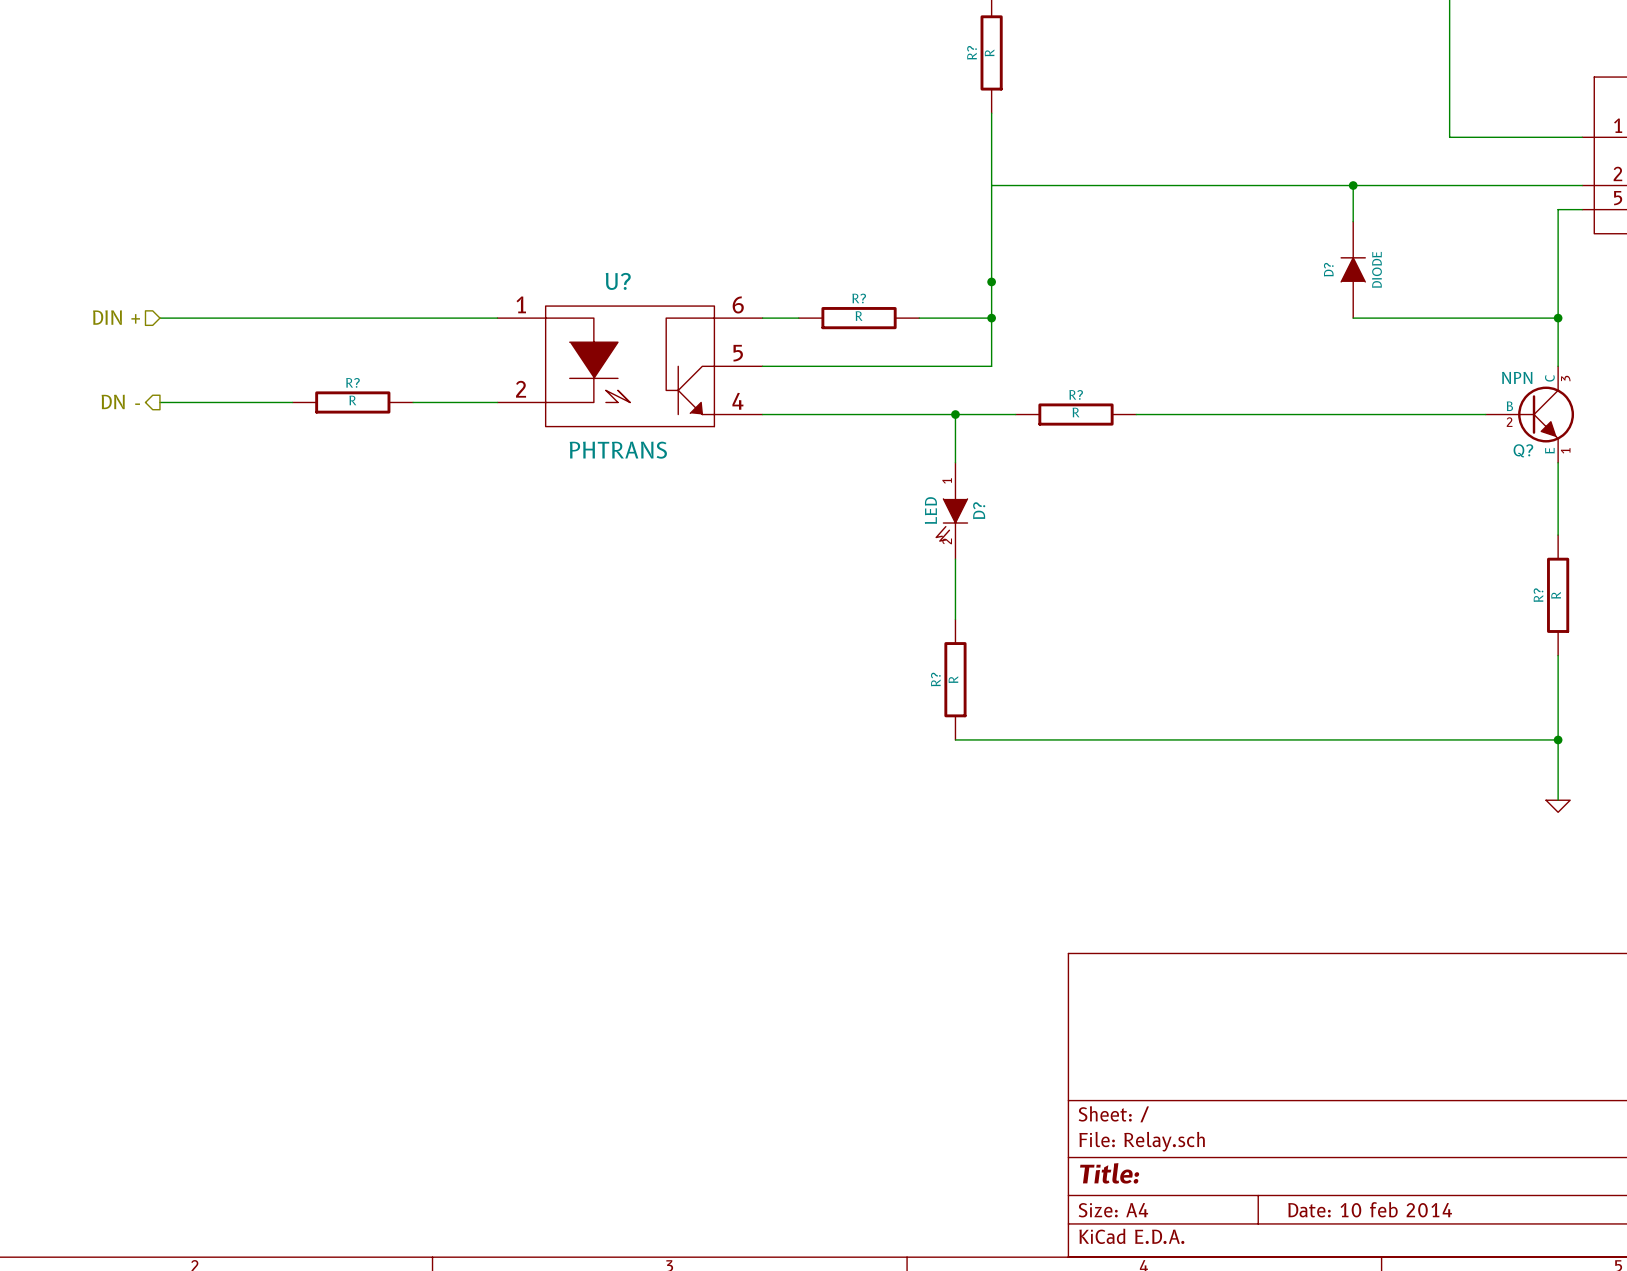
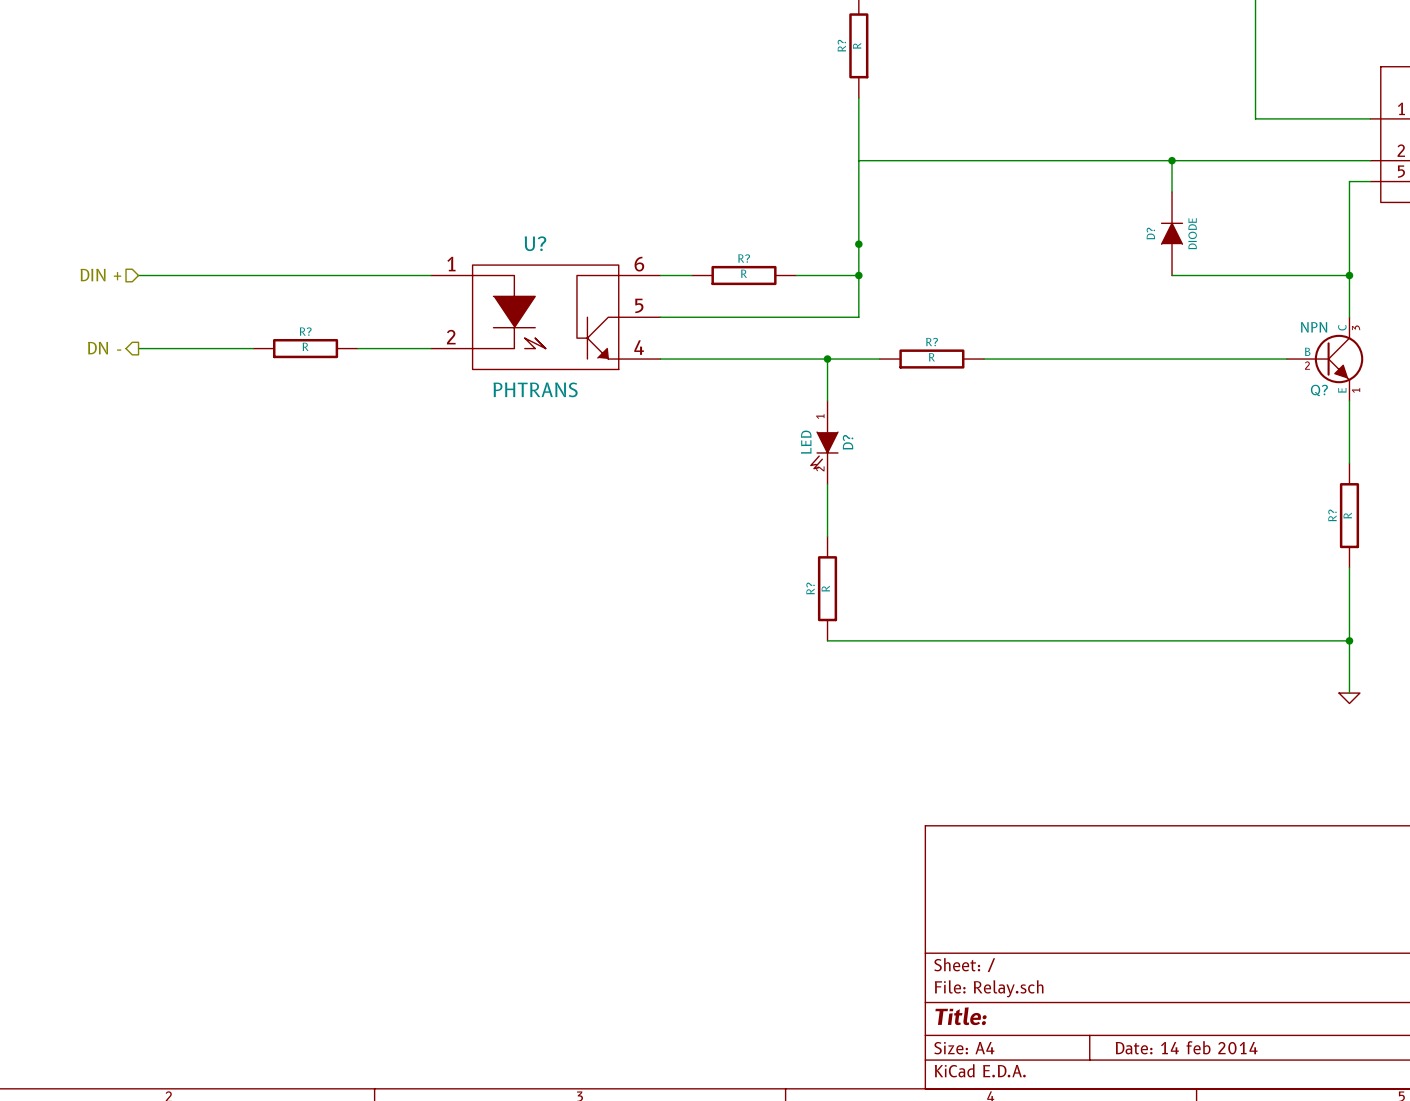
title block: Date: 10 feb 2014 (1370, 1209) -> Date: 14 feb 2014 (1186, 1047)

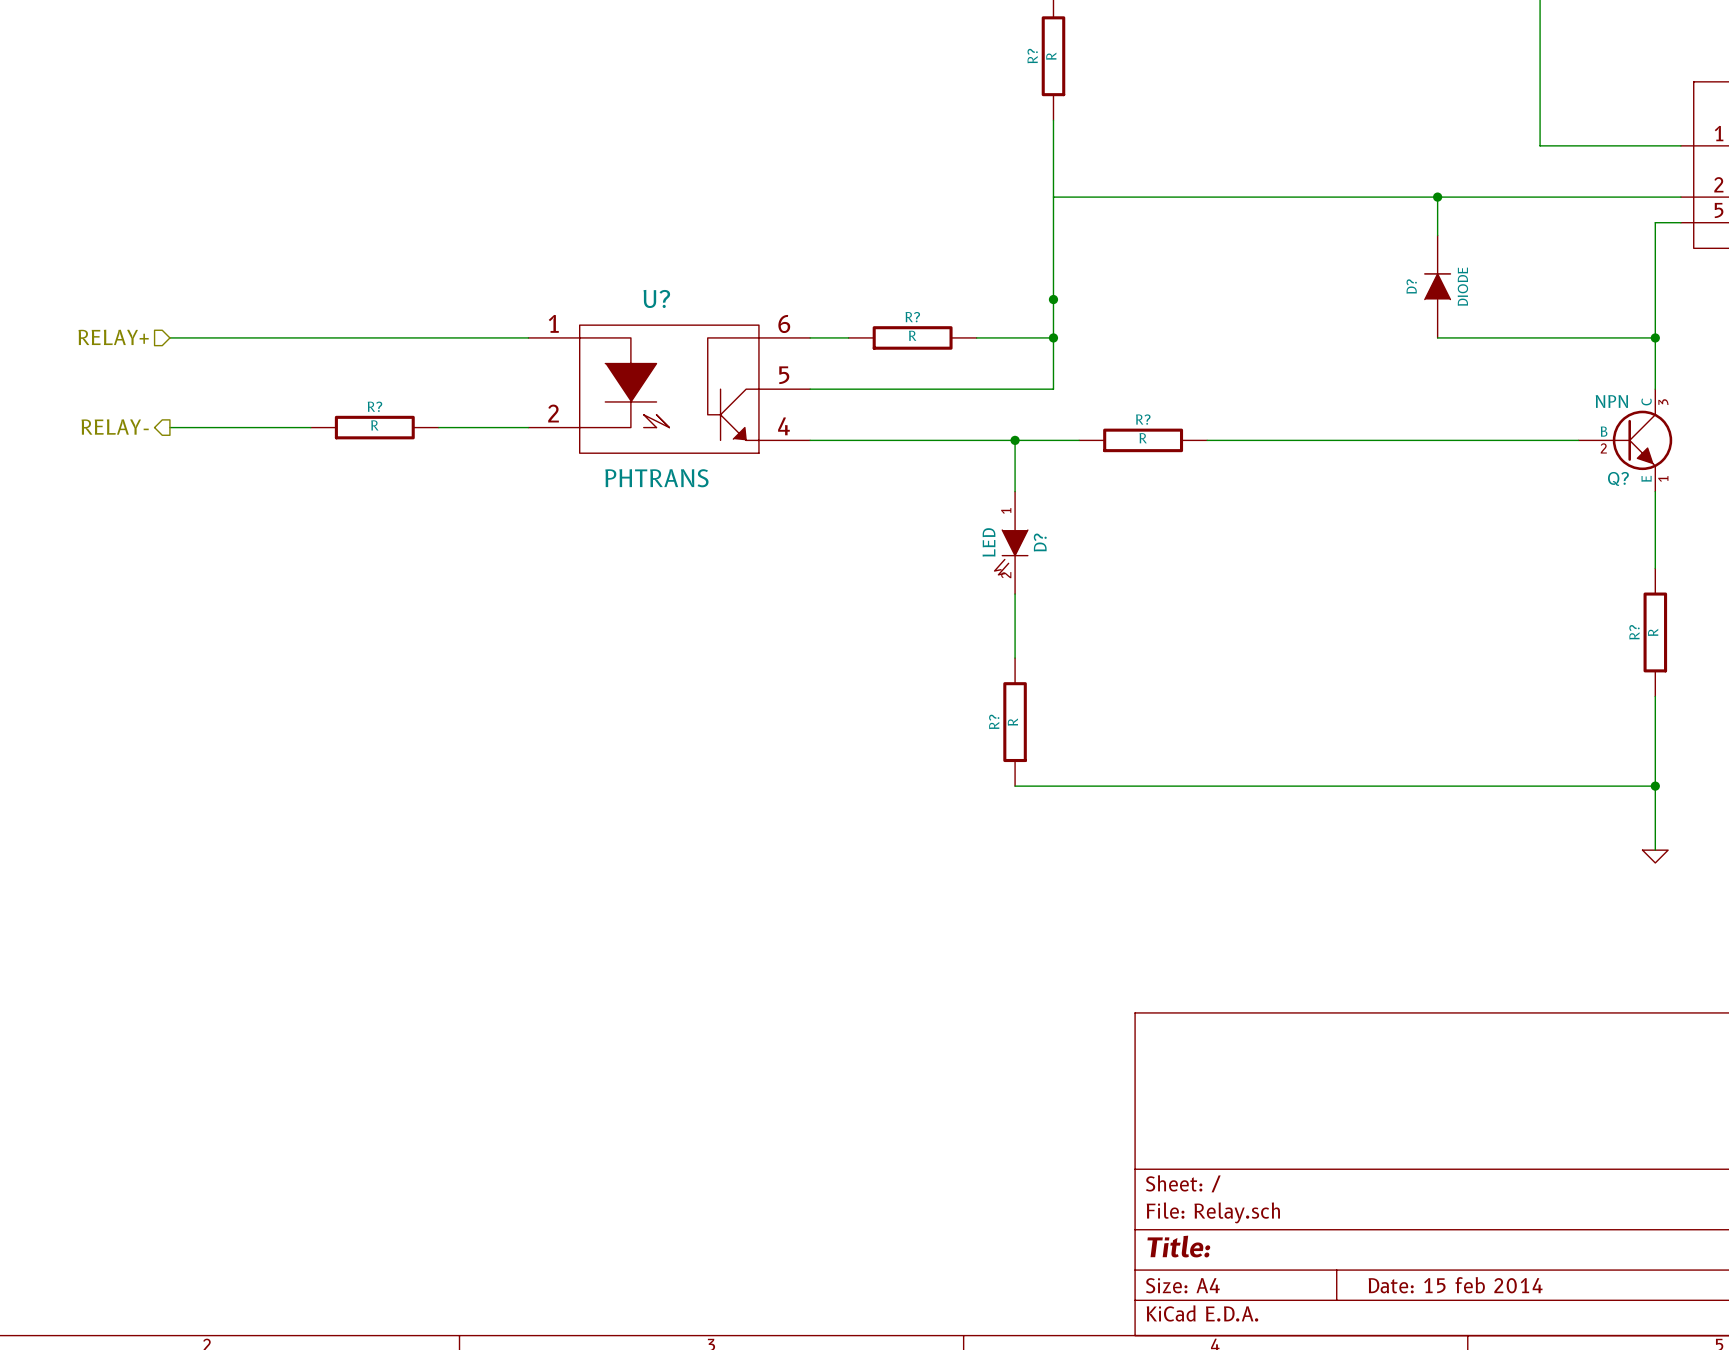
hierarchical label: DIN + (100, 275) -> RELAY+ (113, 337)
hierarchical label: DN - (104, 348) -> RELAY- (115, 427)
title block: Date: 14 feb 2014 (1186, 1047) -> Date: 15 feb 2014 (1455, 1285)

